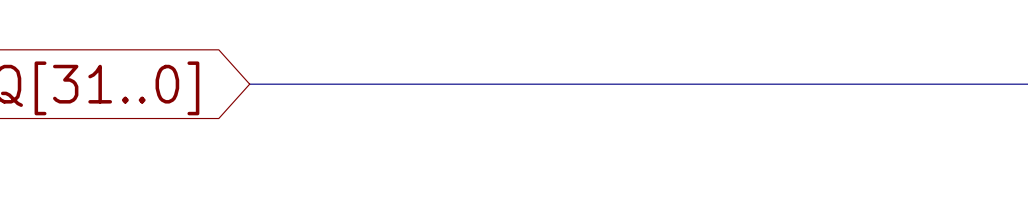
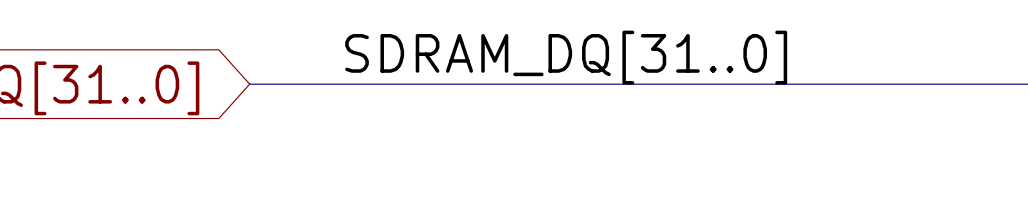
label: none -> SDRAM_DQ[31..0] (566, 57)

